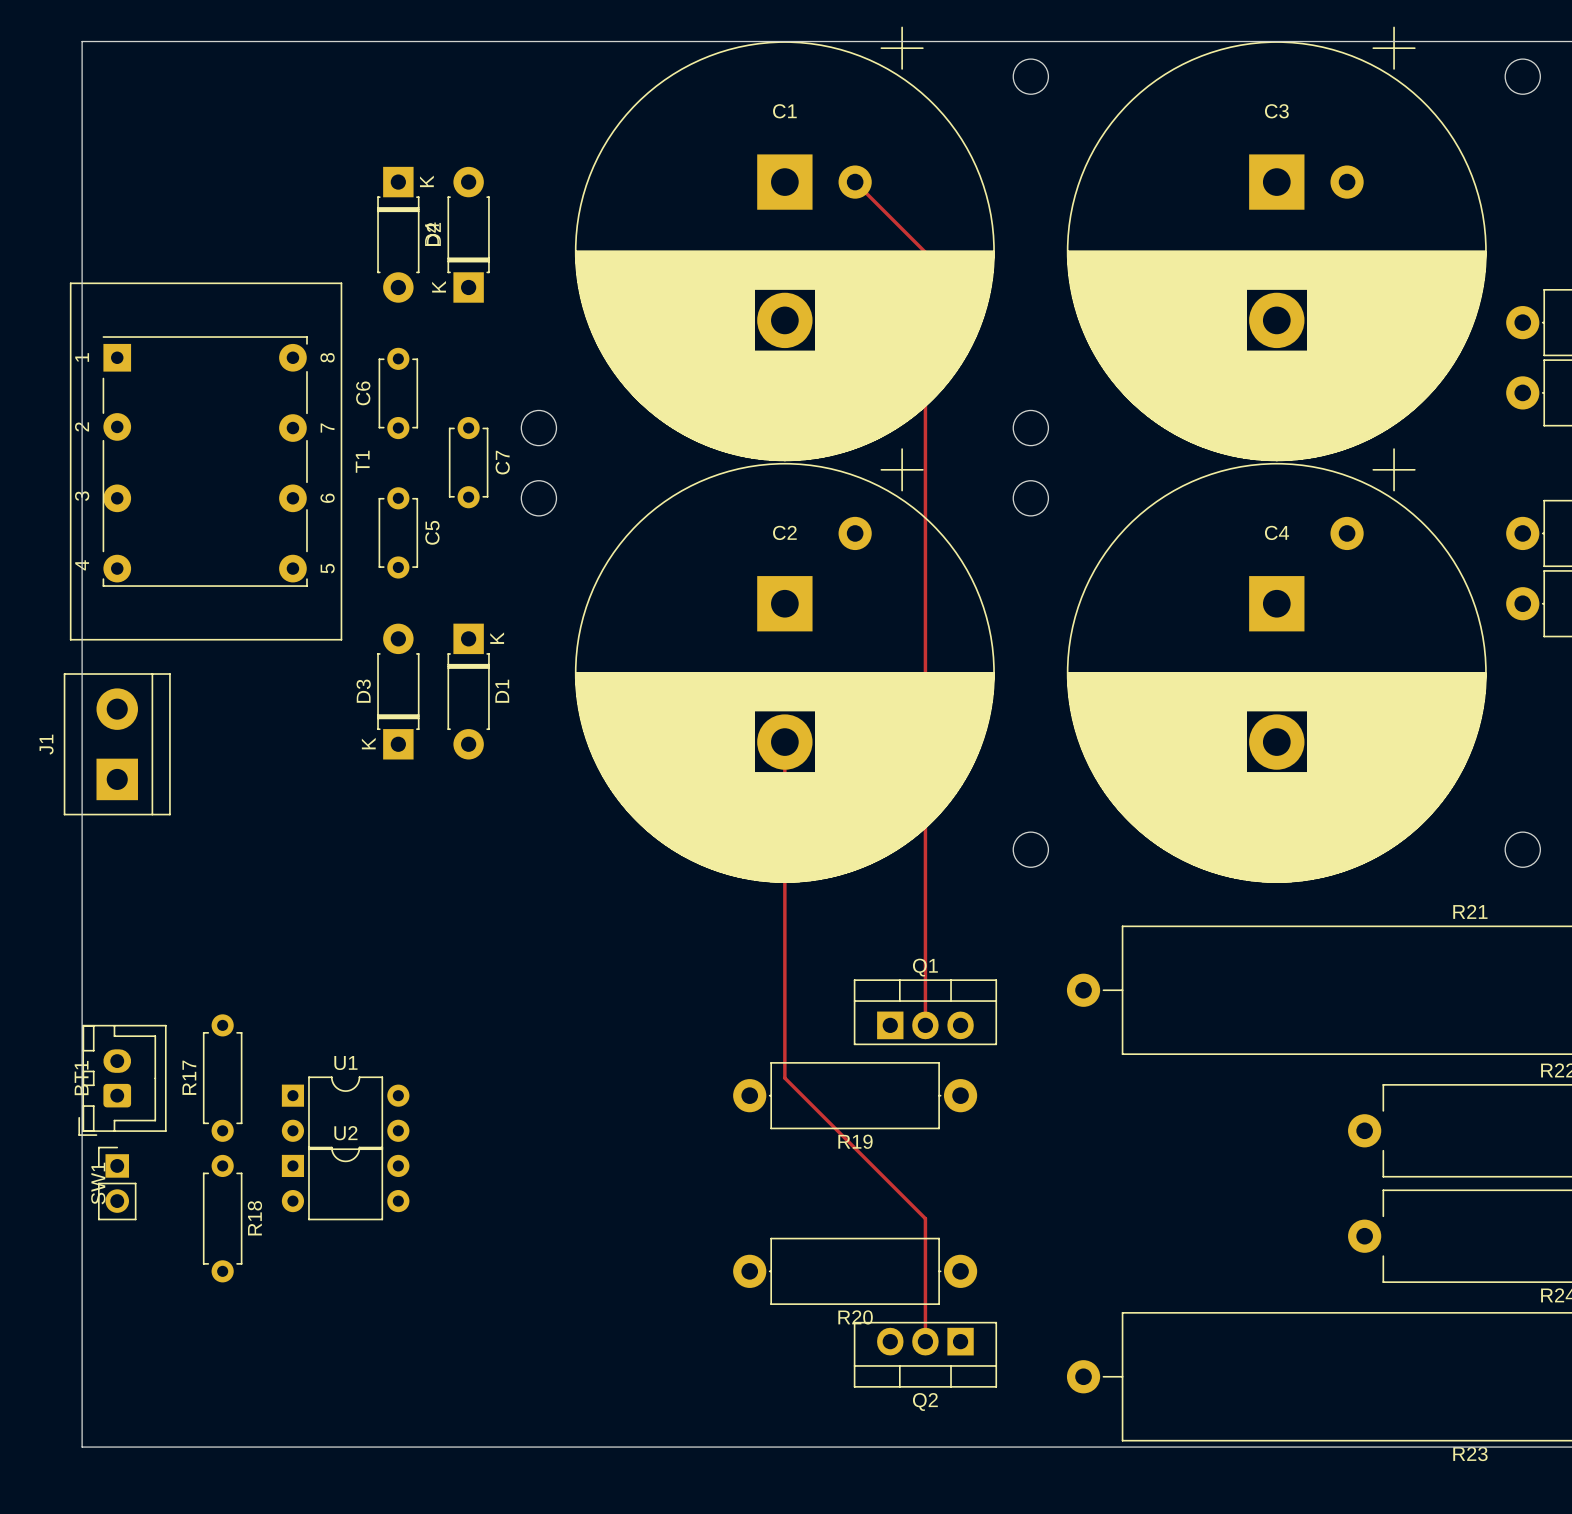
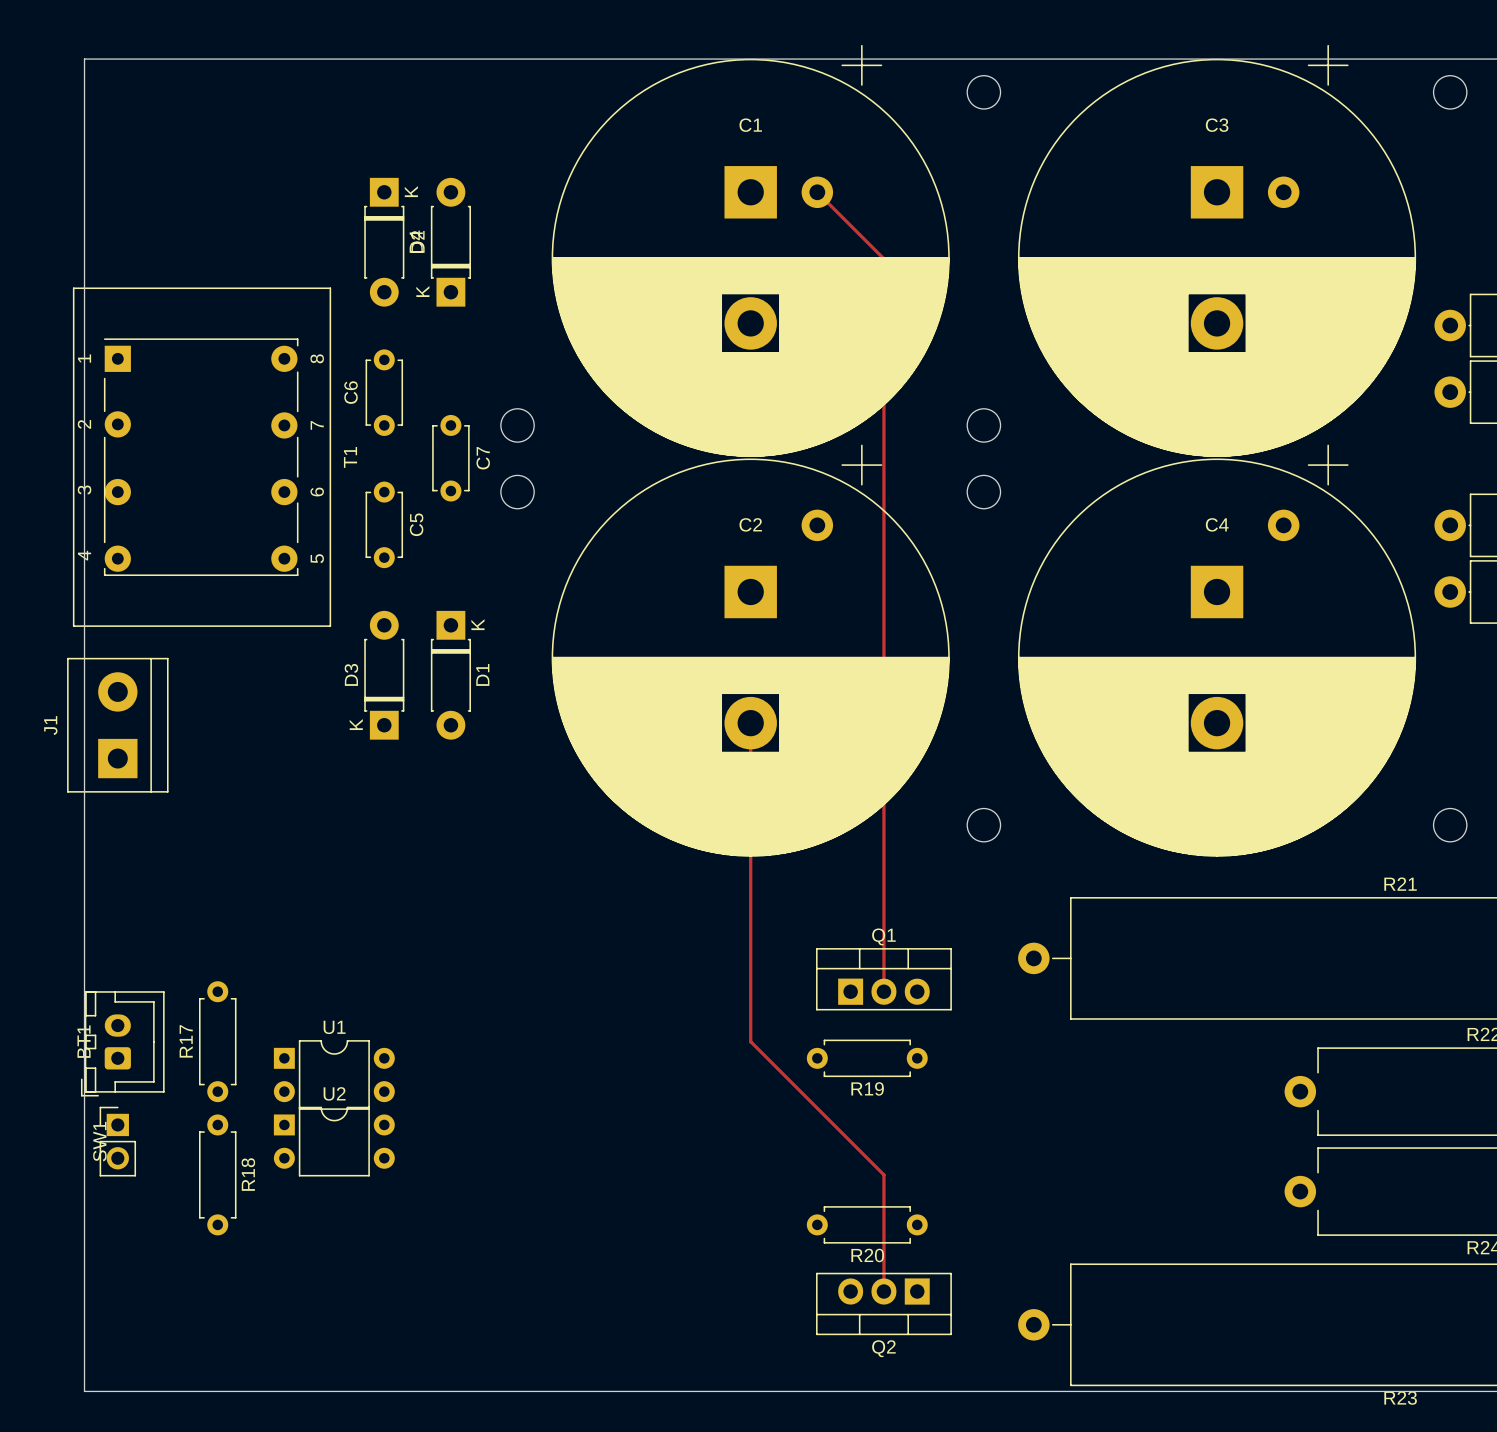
R19 footprint: [733, 1062, 978, 1130] -> [806, 1039, 928, 1078]
R20 footprint: [733, 1237, 978, 1305] -> [806, 1206, 928, 1244]

